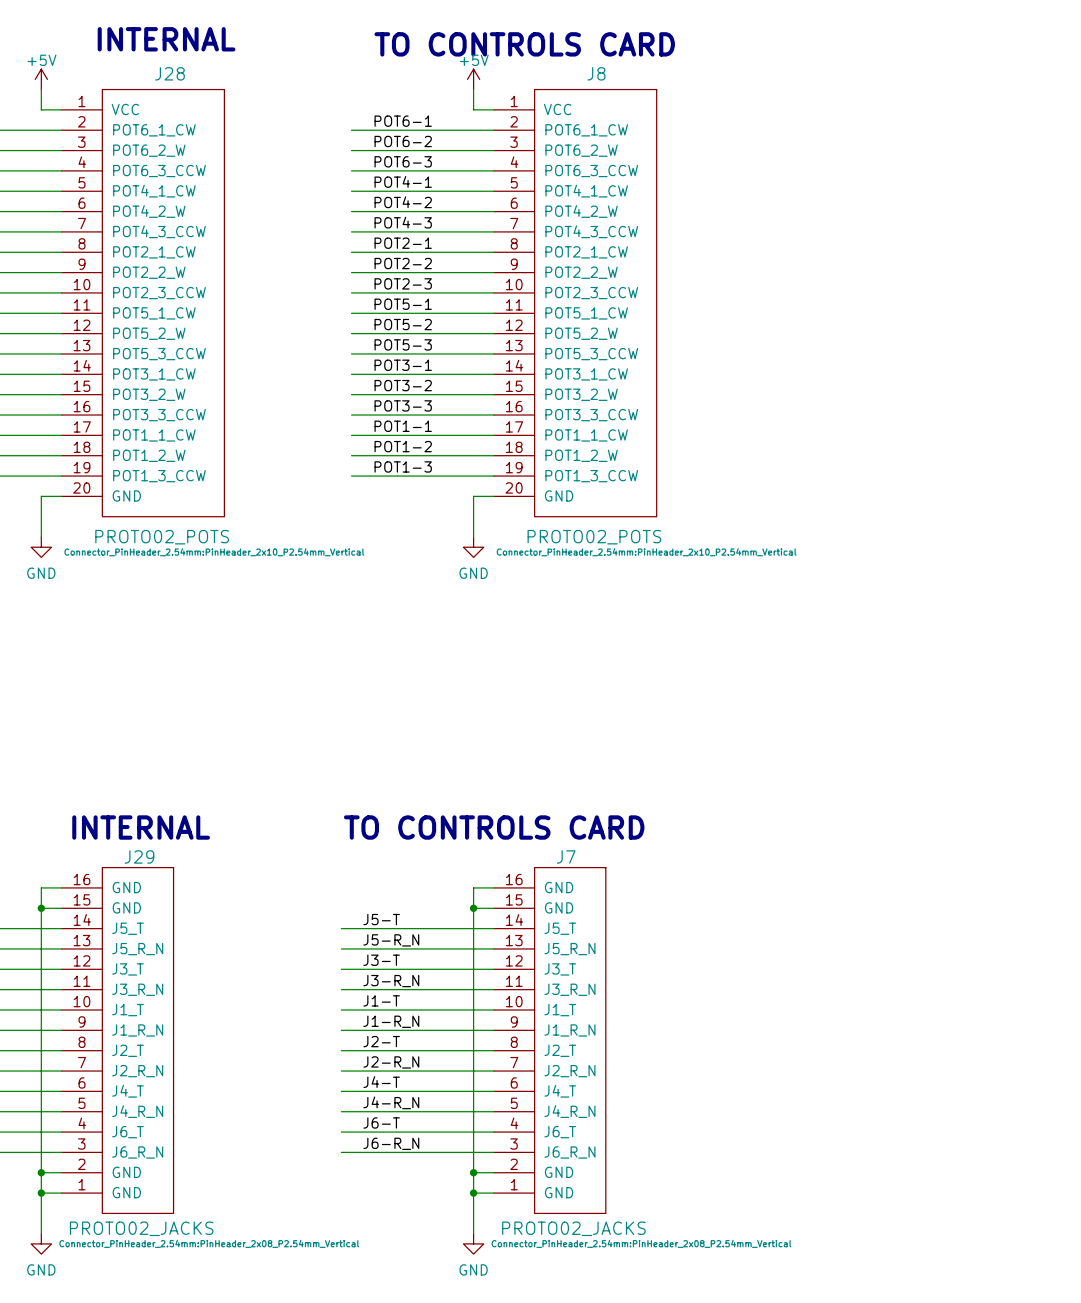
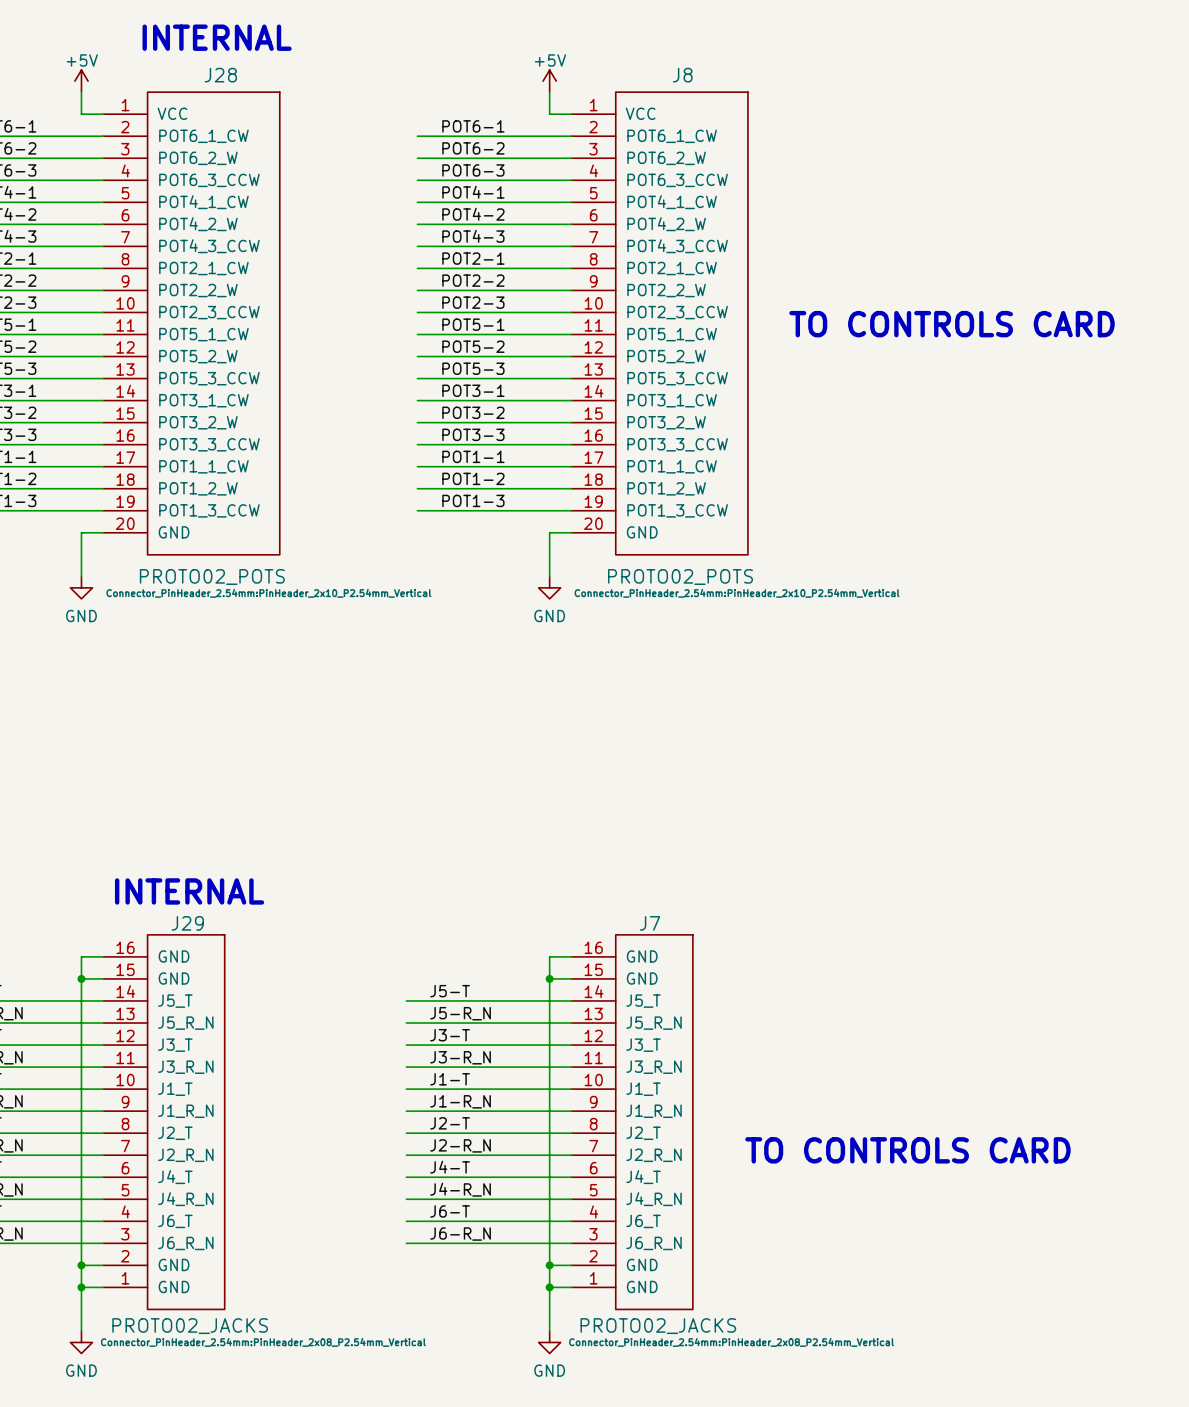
text: TO CONTROLS CARD (524, 44) -> none
text: none -> TO CONTROLS CARD (952, 324)
text: TO CONTROLS CARD (494, 827) -> none
text: none -> TO CONTROLS CARD (907, 1150)

